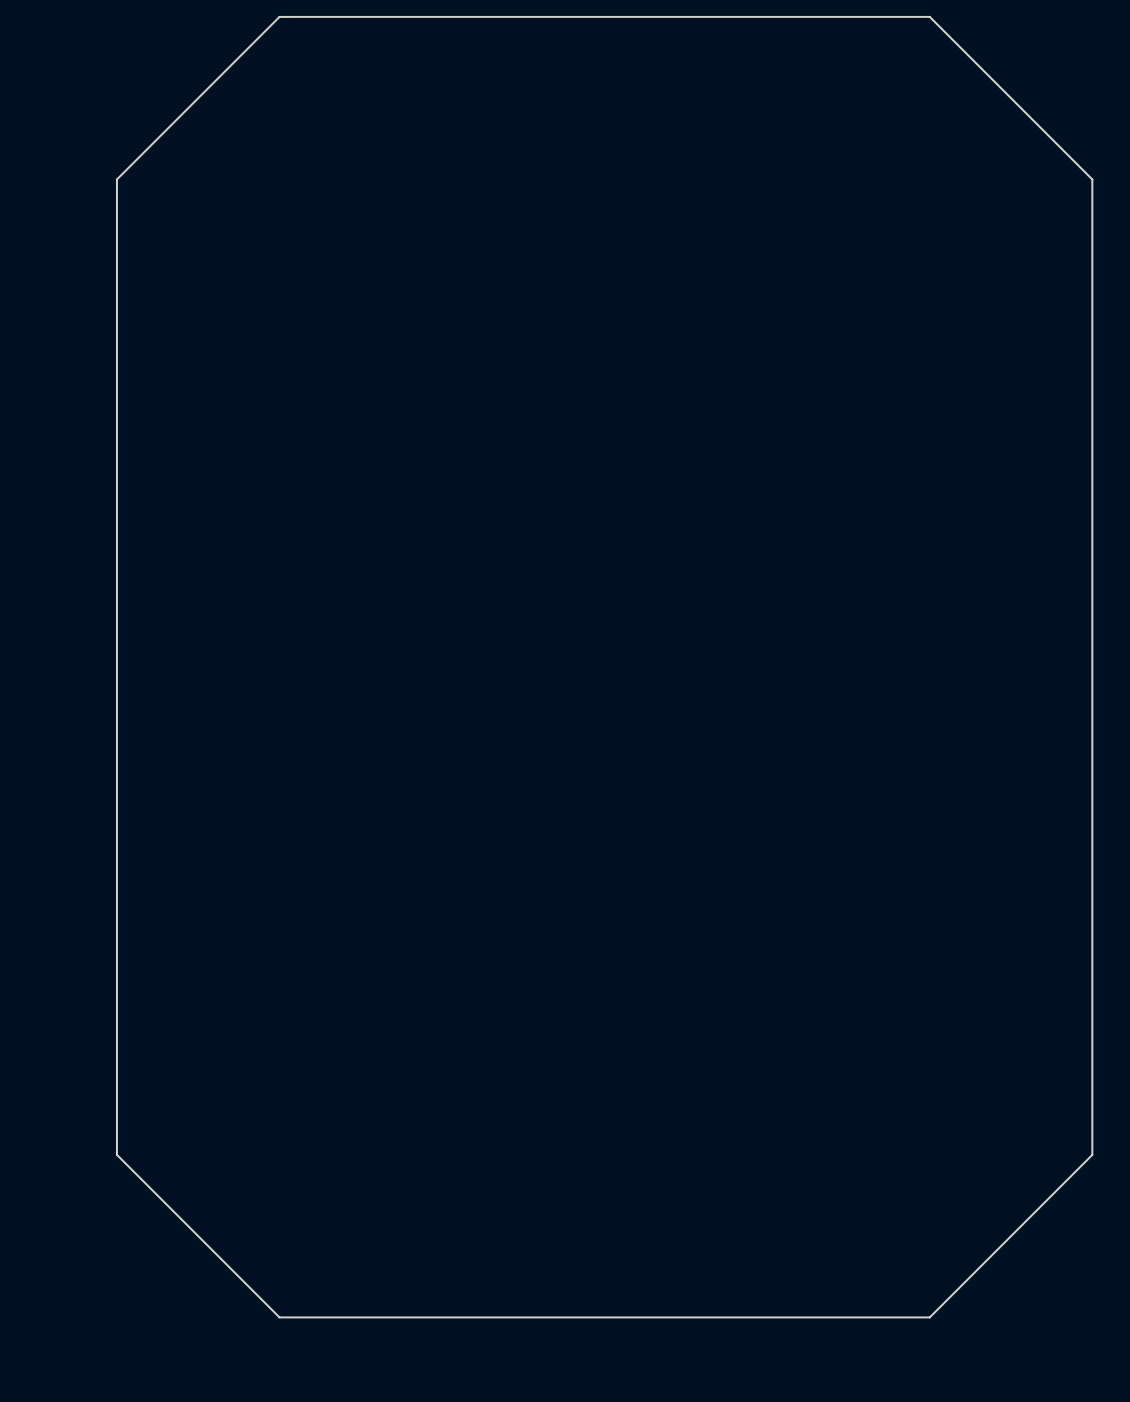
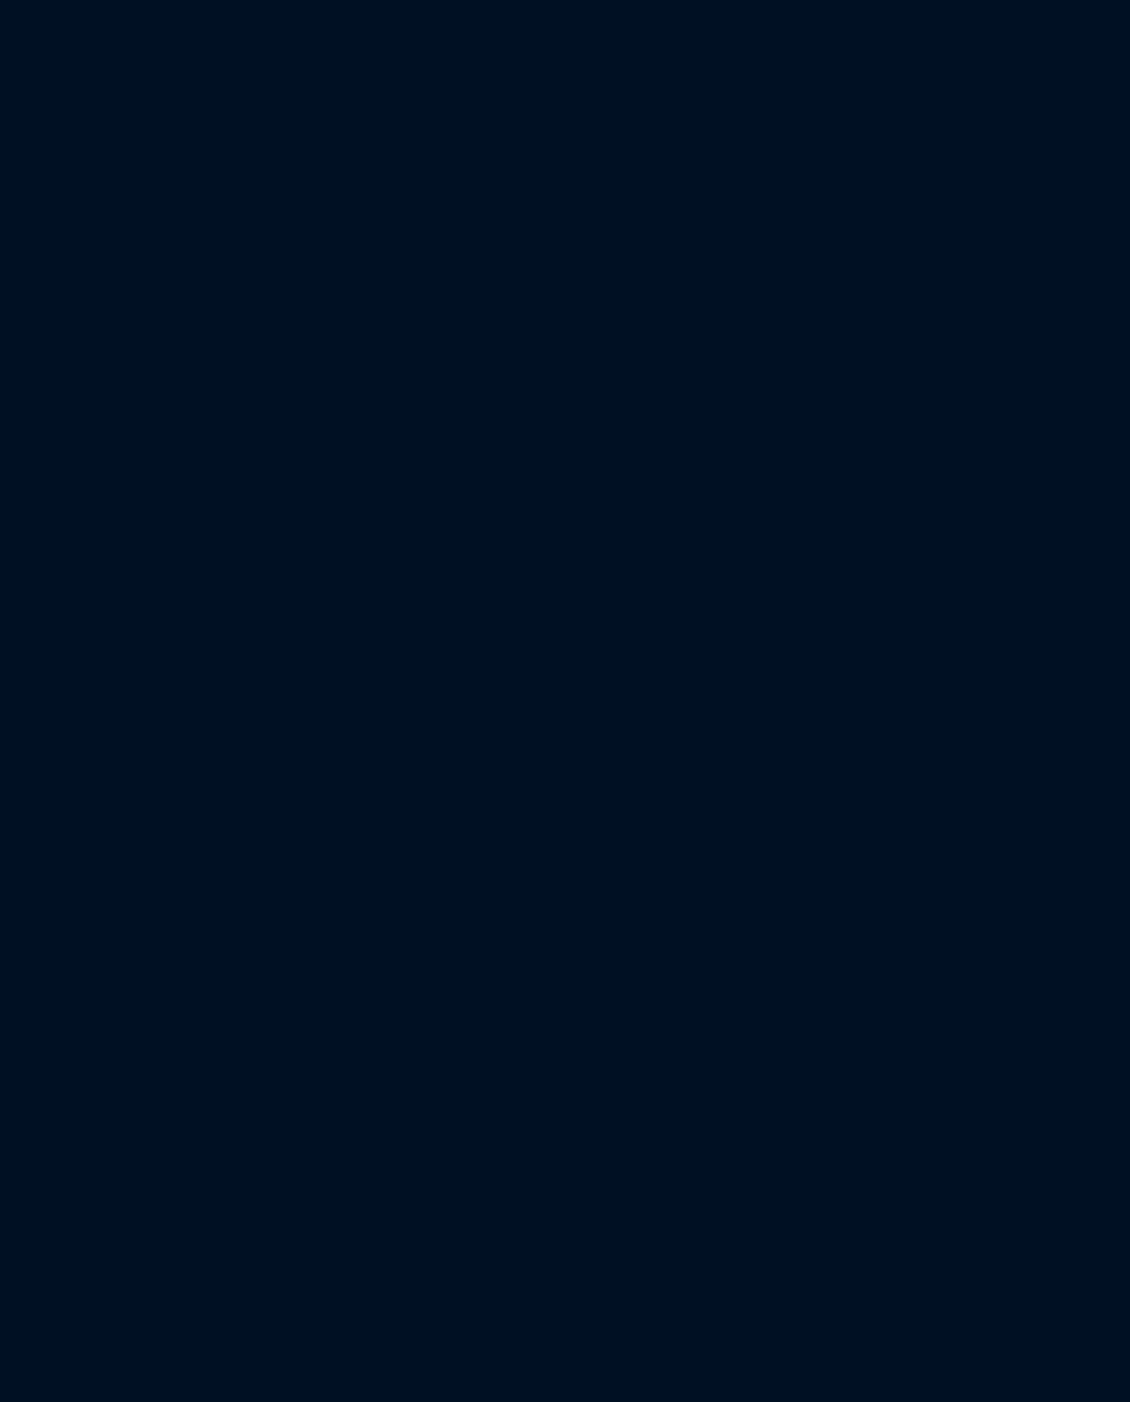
board edge: (929, 16) (1092, 179) (1092, 1154) (929, 1317) (279, 1317) (116, 1154) (116, 179) (279, 16) (929, 16) -> none

